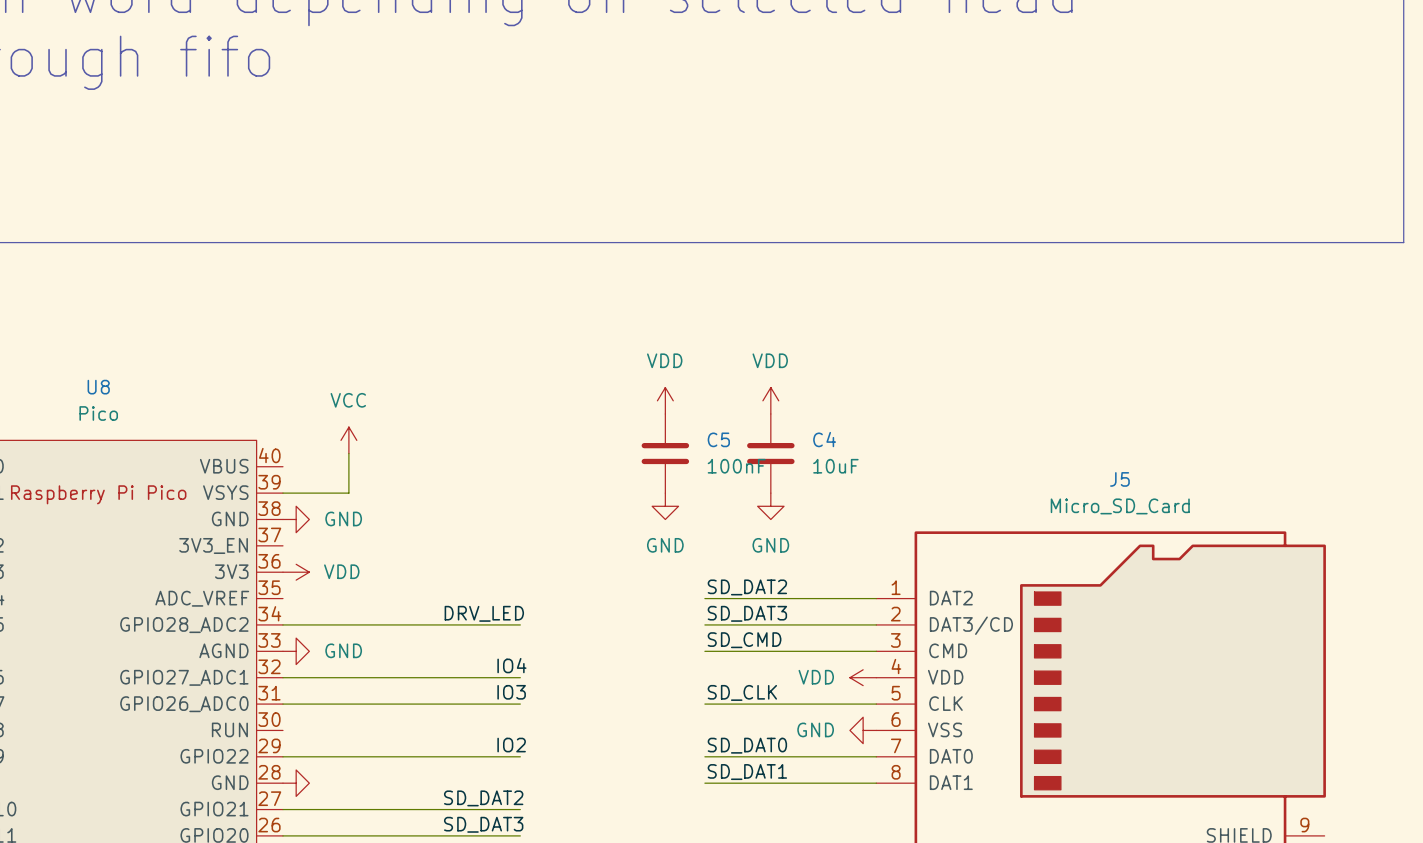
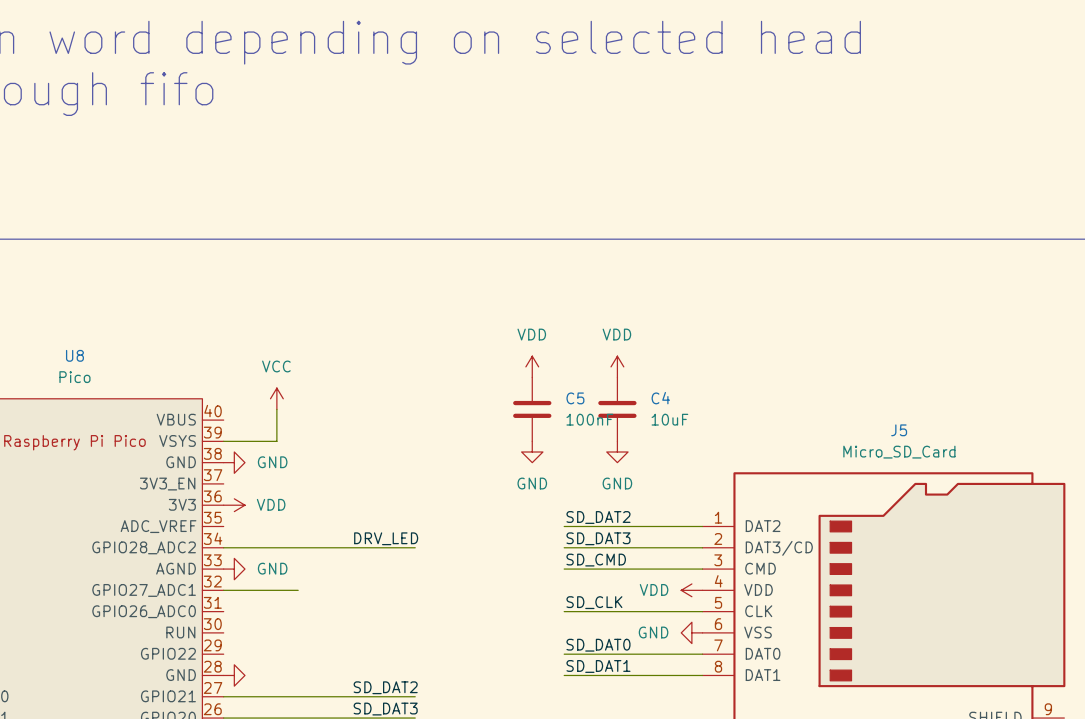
label: IO4 (511, 665) -> none
wire: (375, 677) (520, 677) -> none
label: IO3 (511, 692) -> none
wire: (282, 704) (520, 704) -> none
label: IO2 (511, 745) -> none
wire: (282, 756) (520, 756) -> none

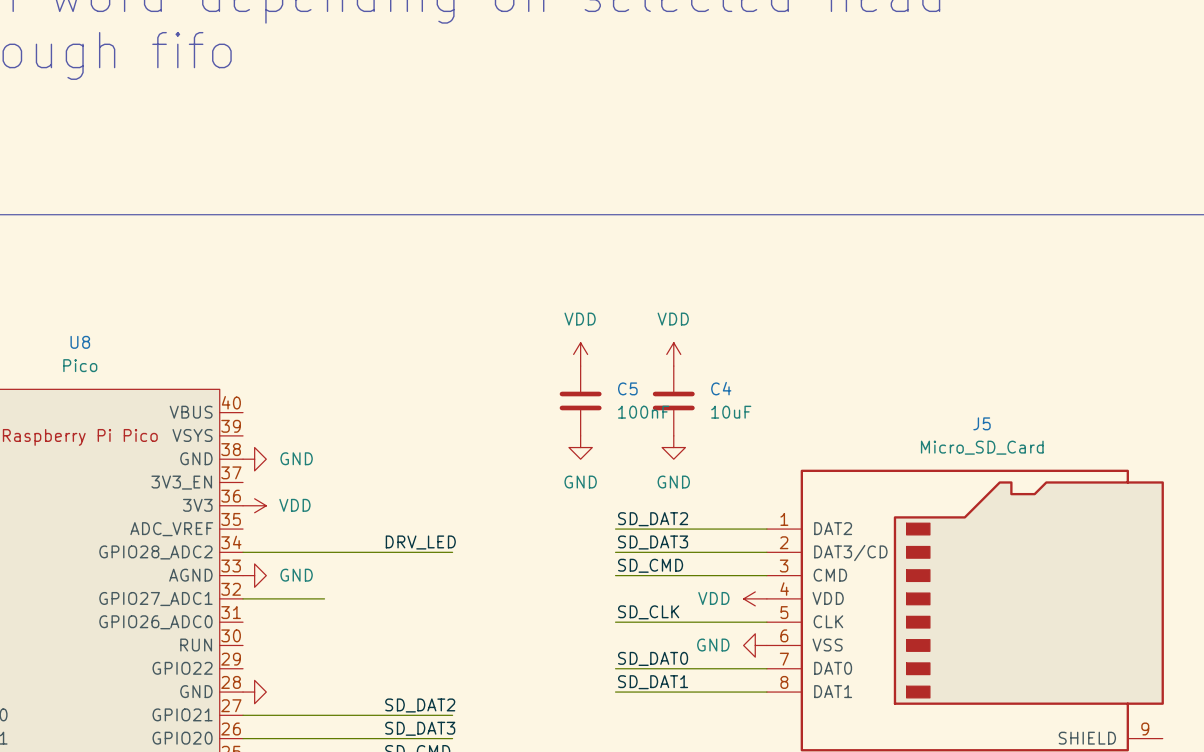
power symbol: VCC (276, 398) -> none
wire: (276, 409) (276, 441) (223, 441) -> none

